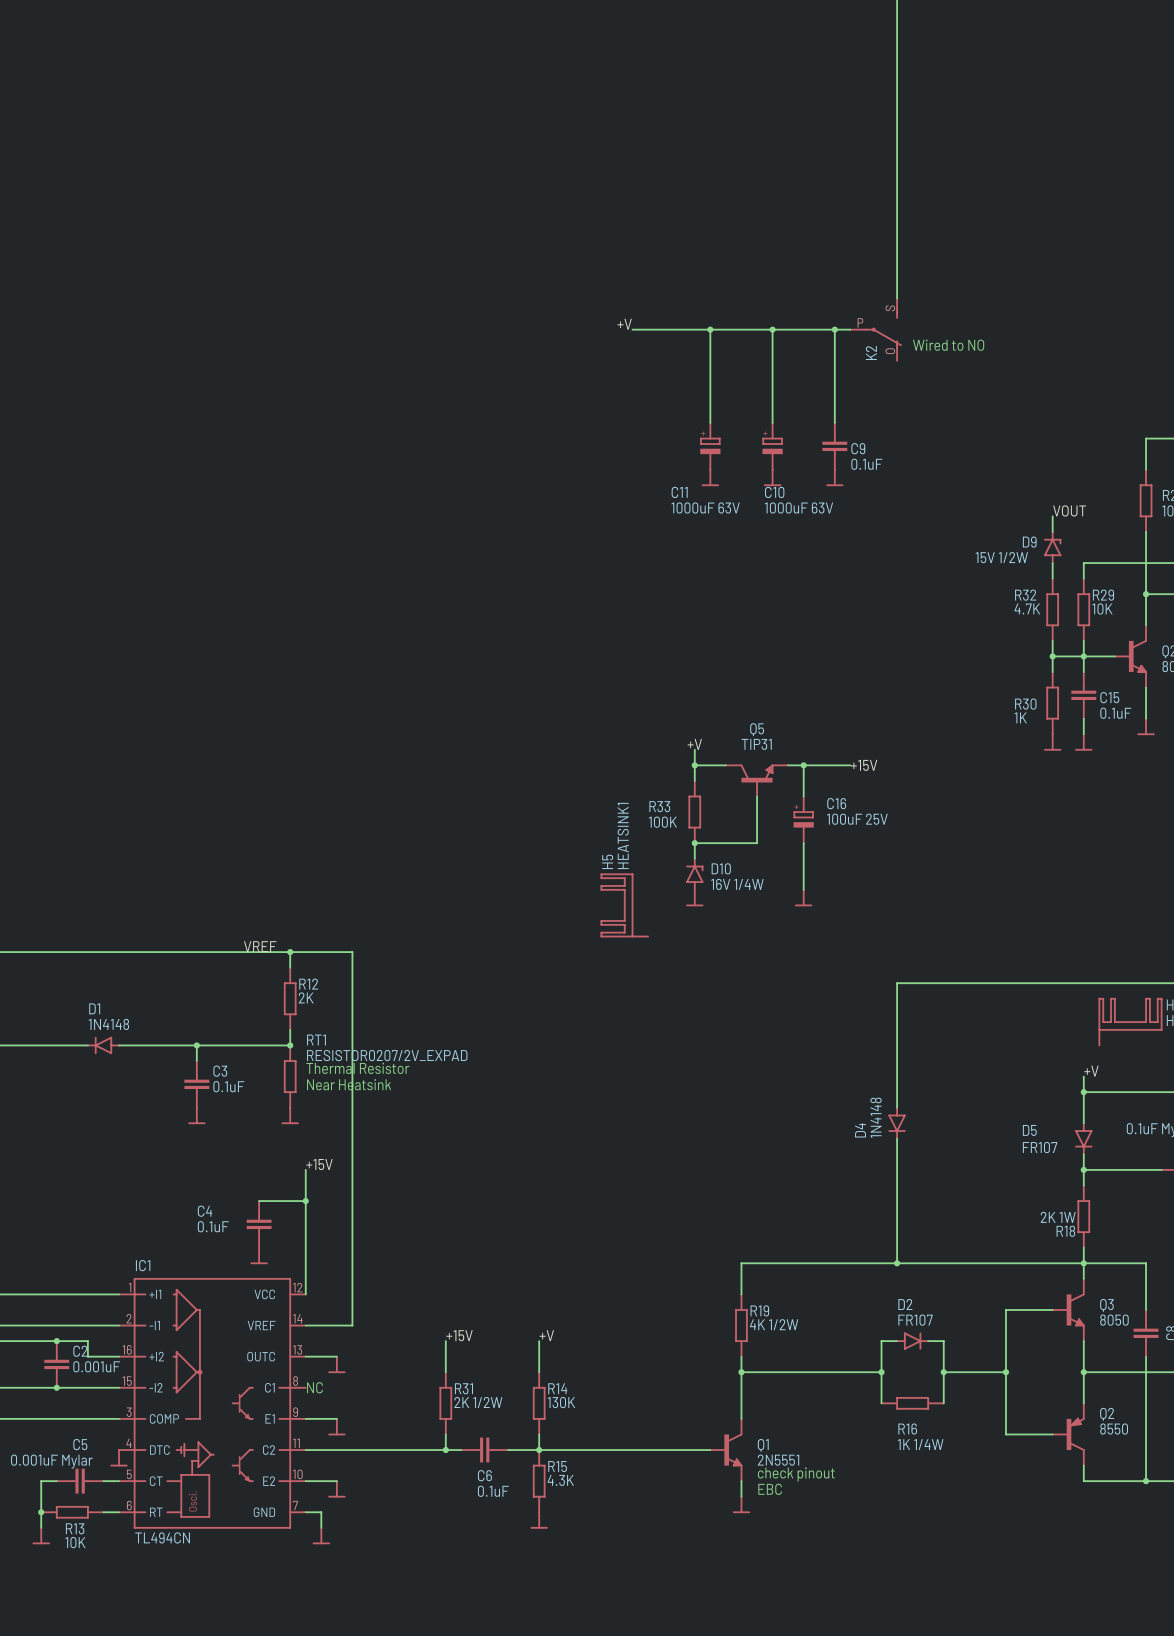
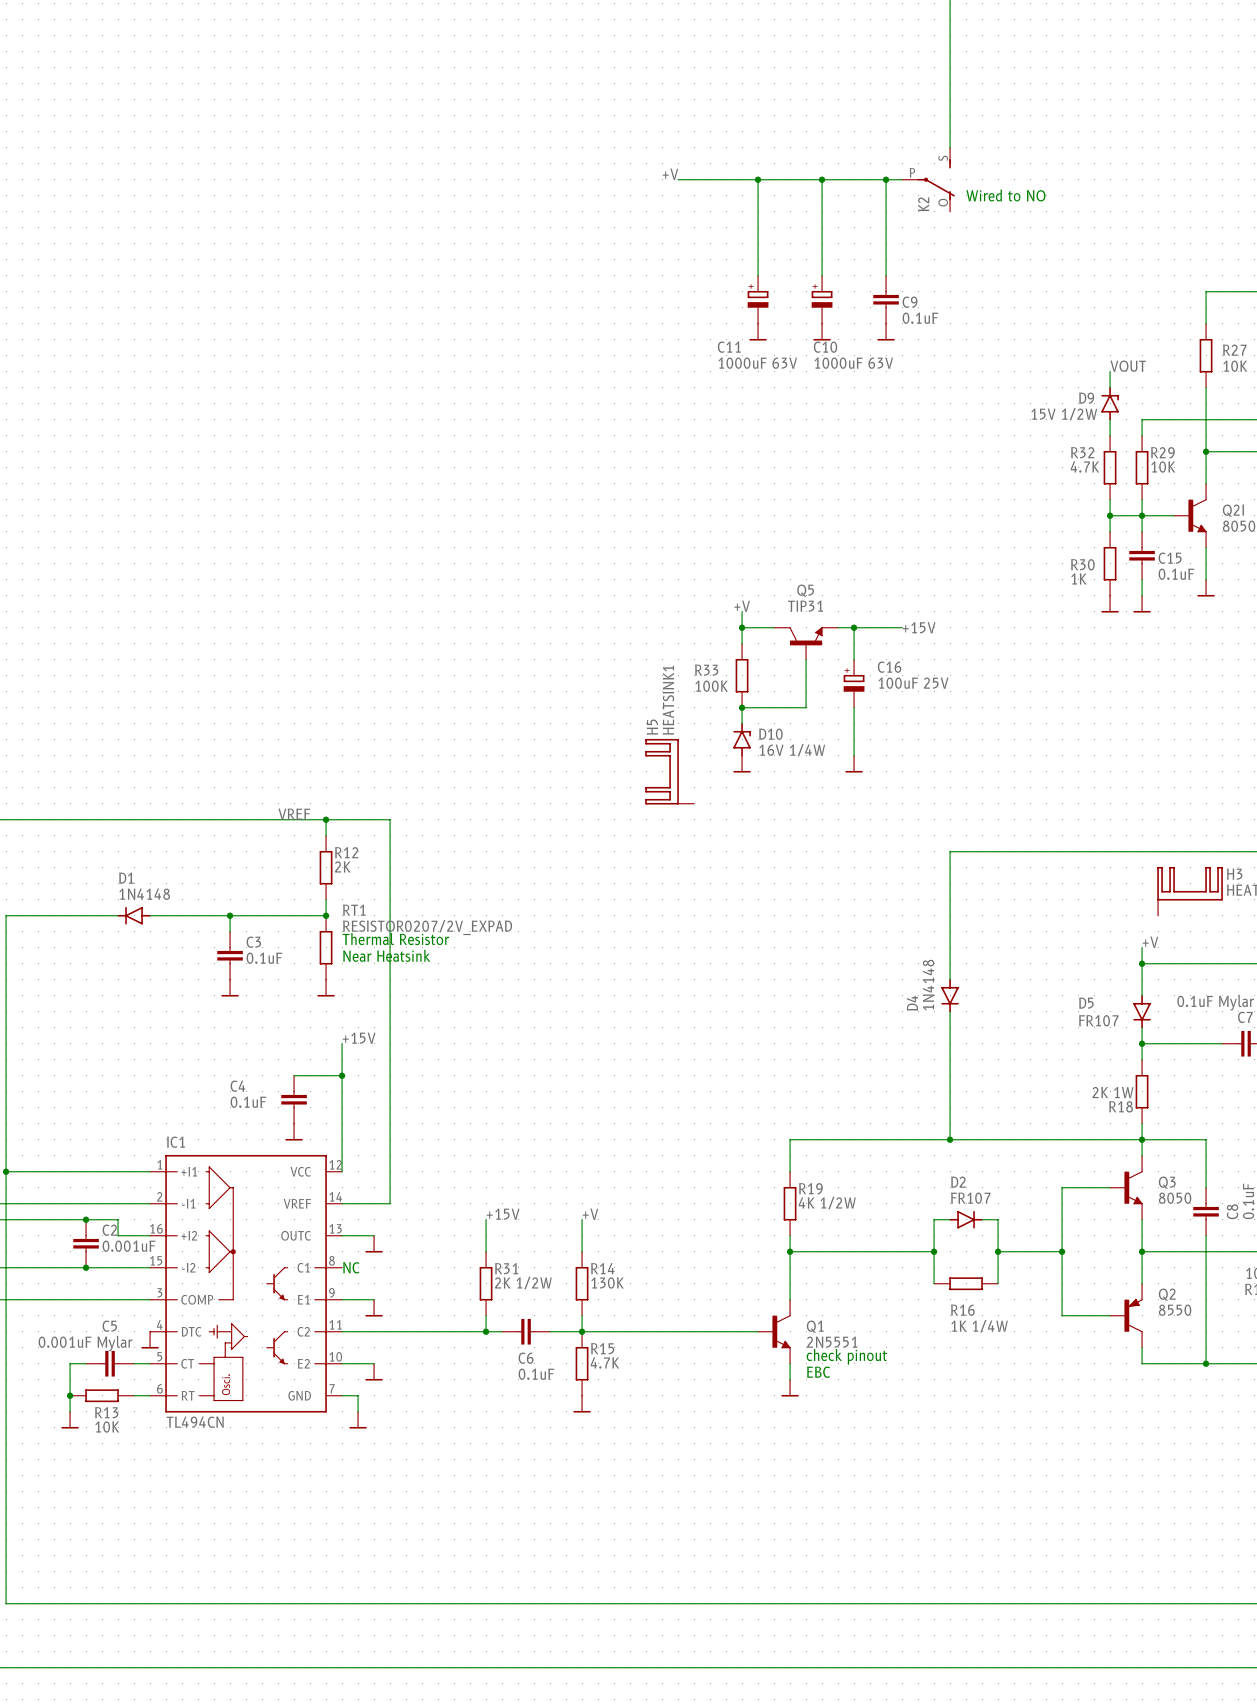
R15 value: 4.3K (560, 1480) -> 4.7K (604, 1363)

